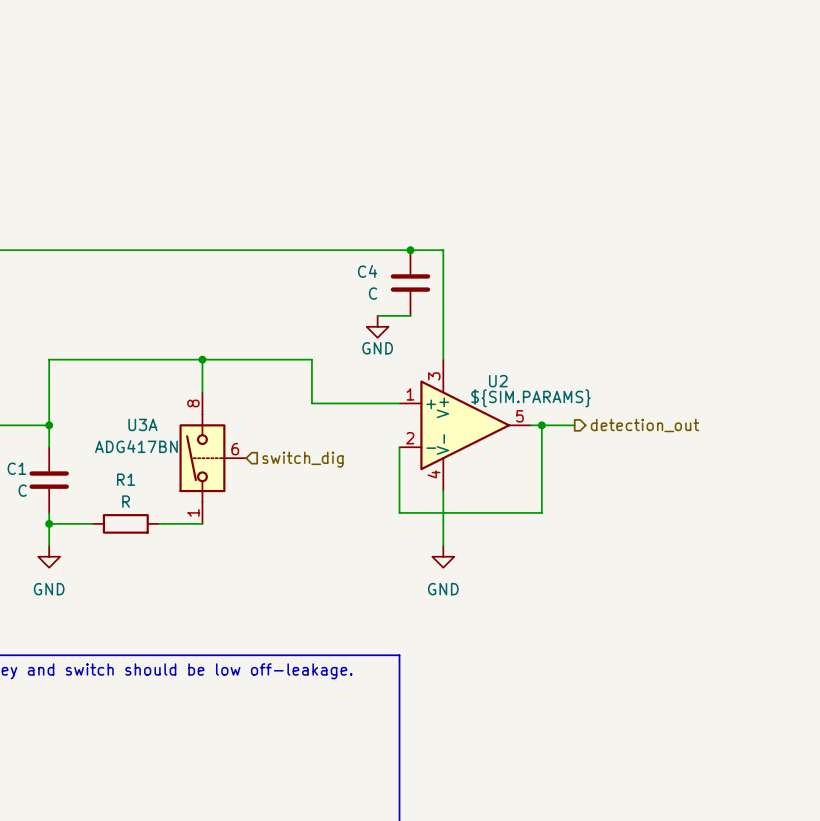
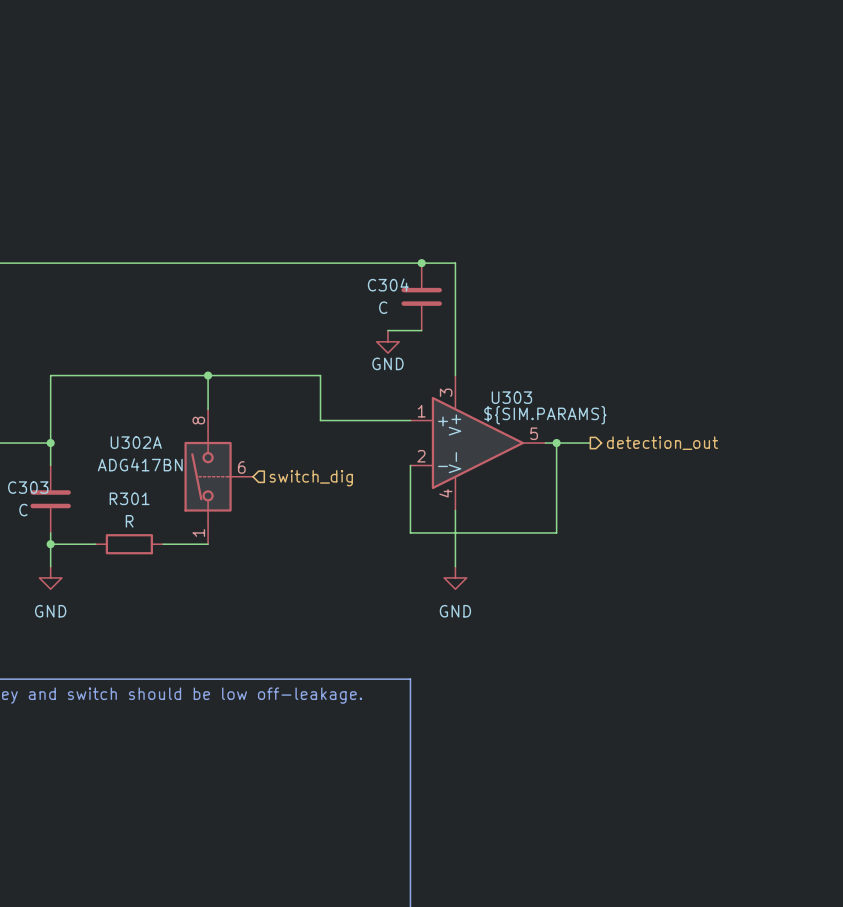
C4 name: C4 (367, 271) -> C304 (388, 284)
U2 name: U2 (498, 381) -> U303 (511, 397)
U3A name: U3A (142, 424) -> U302A (136, 442)
C1 name: C1 (16, 468) -> C303 (28, 487)
R1 name: R1 (126, 479) -> R301 (129, 498)

